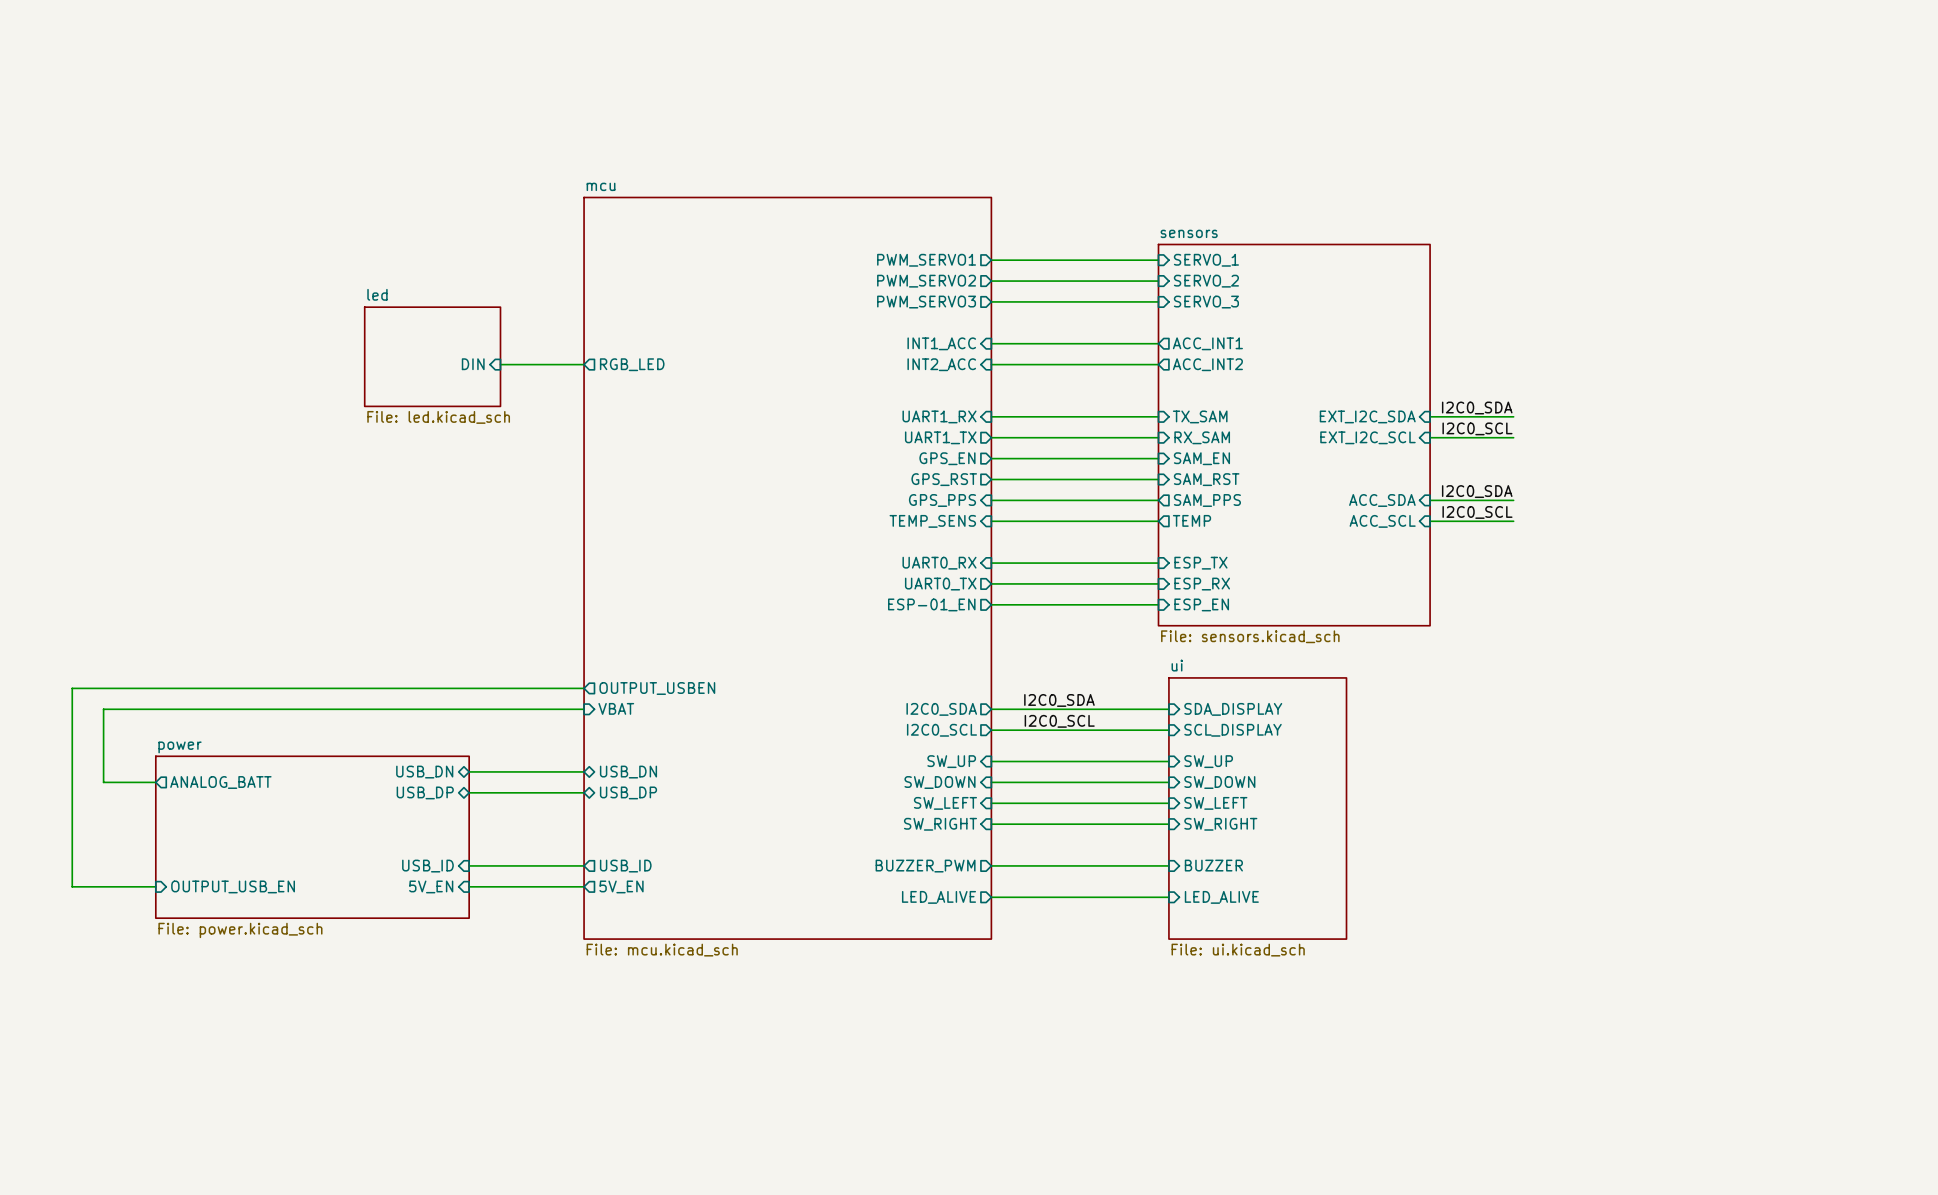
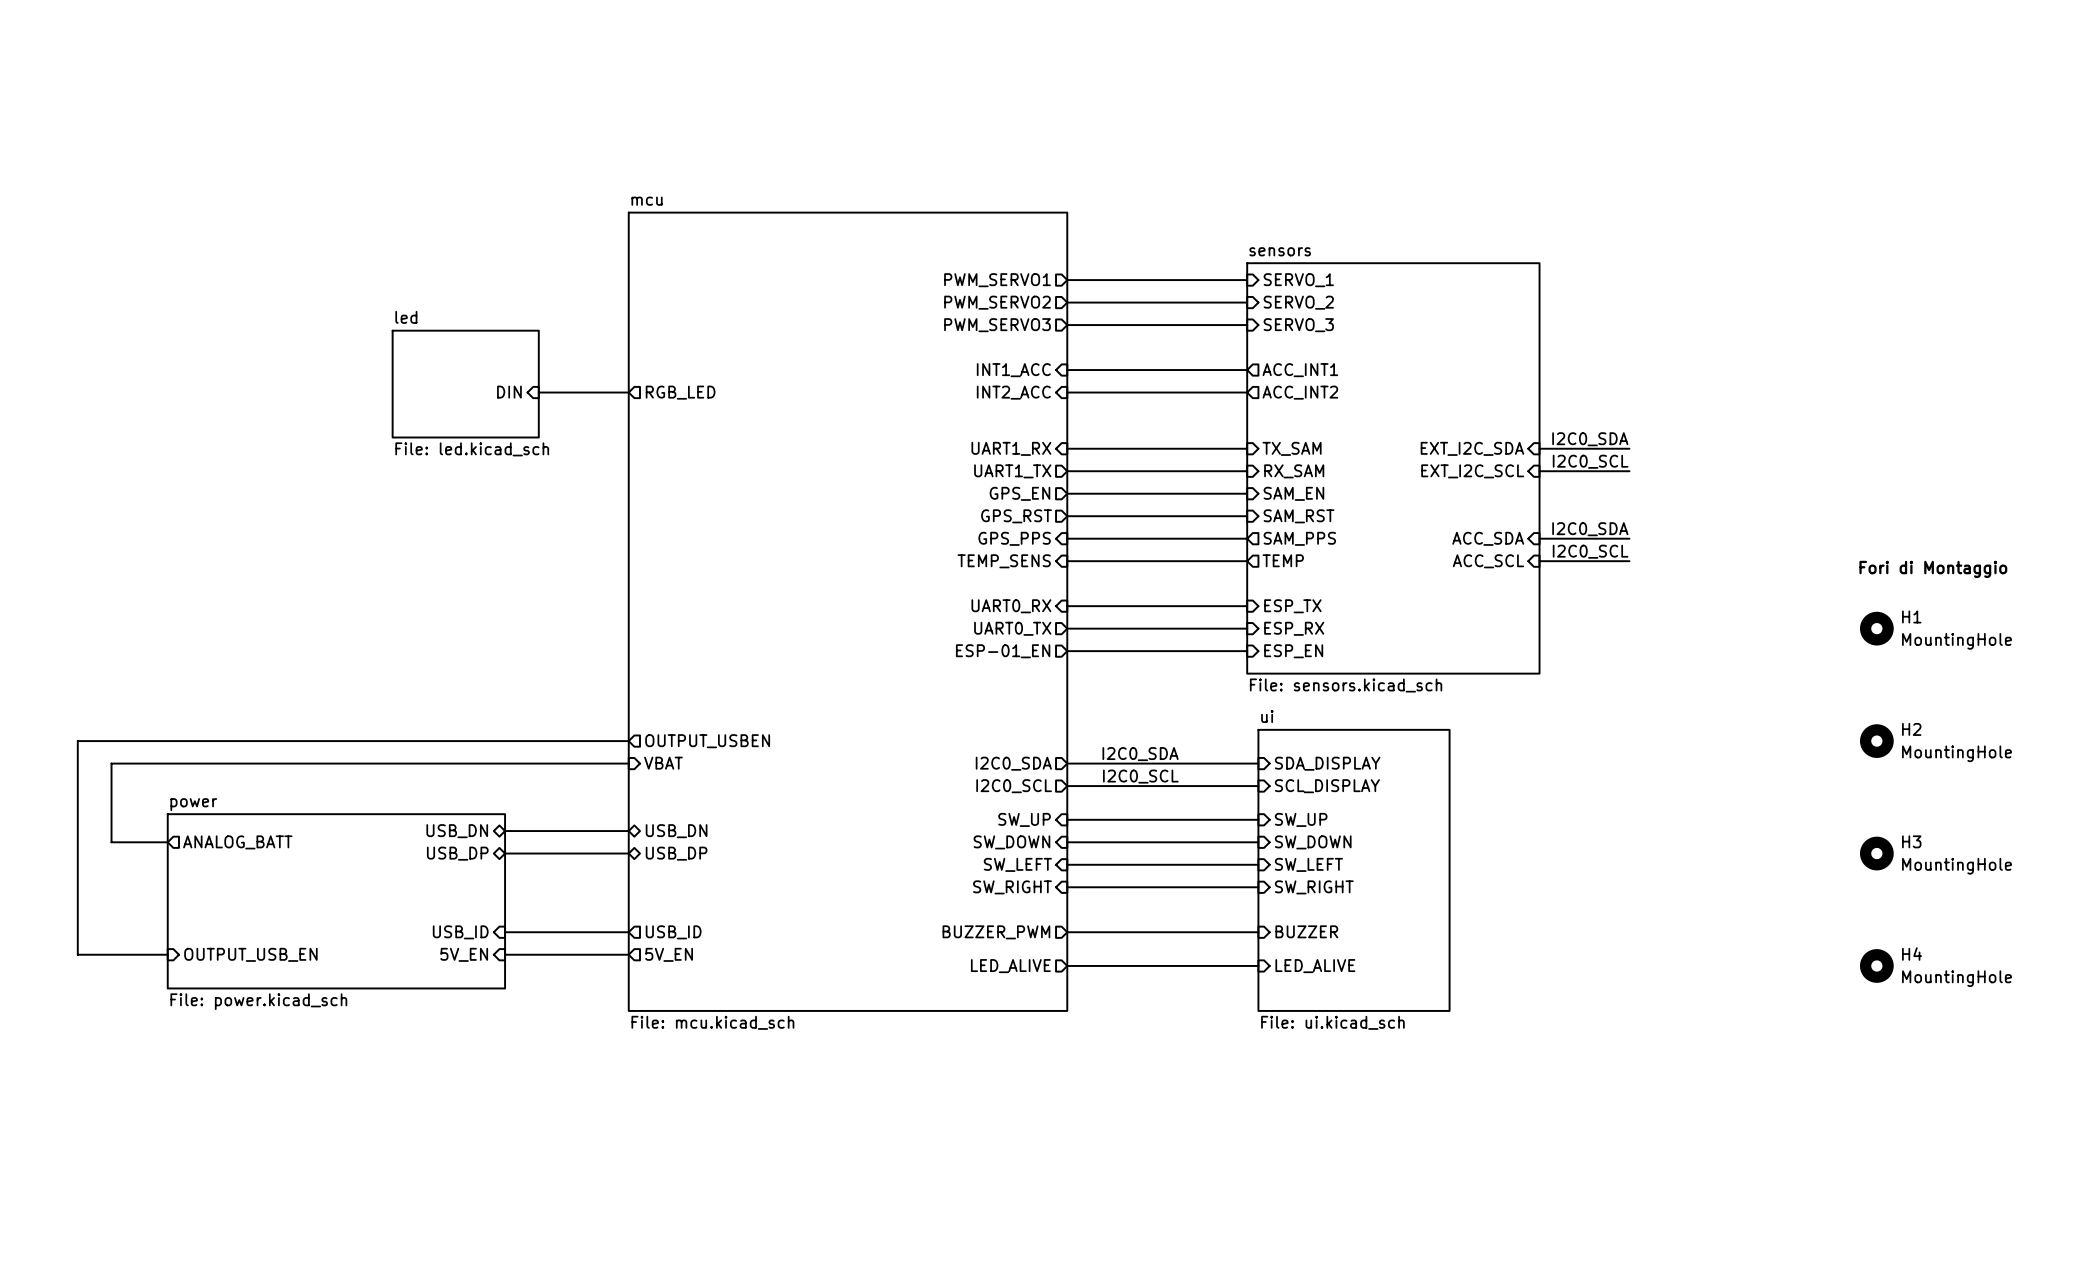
text: none -> Fori di Montaggio (1933, 569)
H1: none -> MountingHole (1876, 628)
H2: none -> MountingHole (1876, 741)
H3: none -> MountingHole (1876, 853)
H4: none -> MountingHole (1876, 965)

